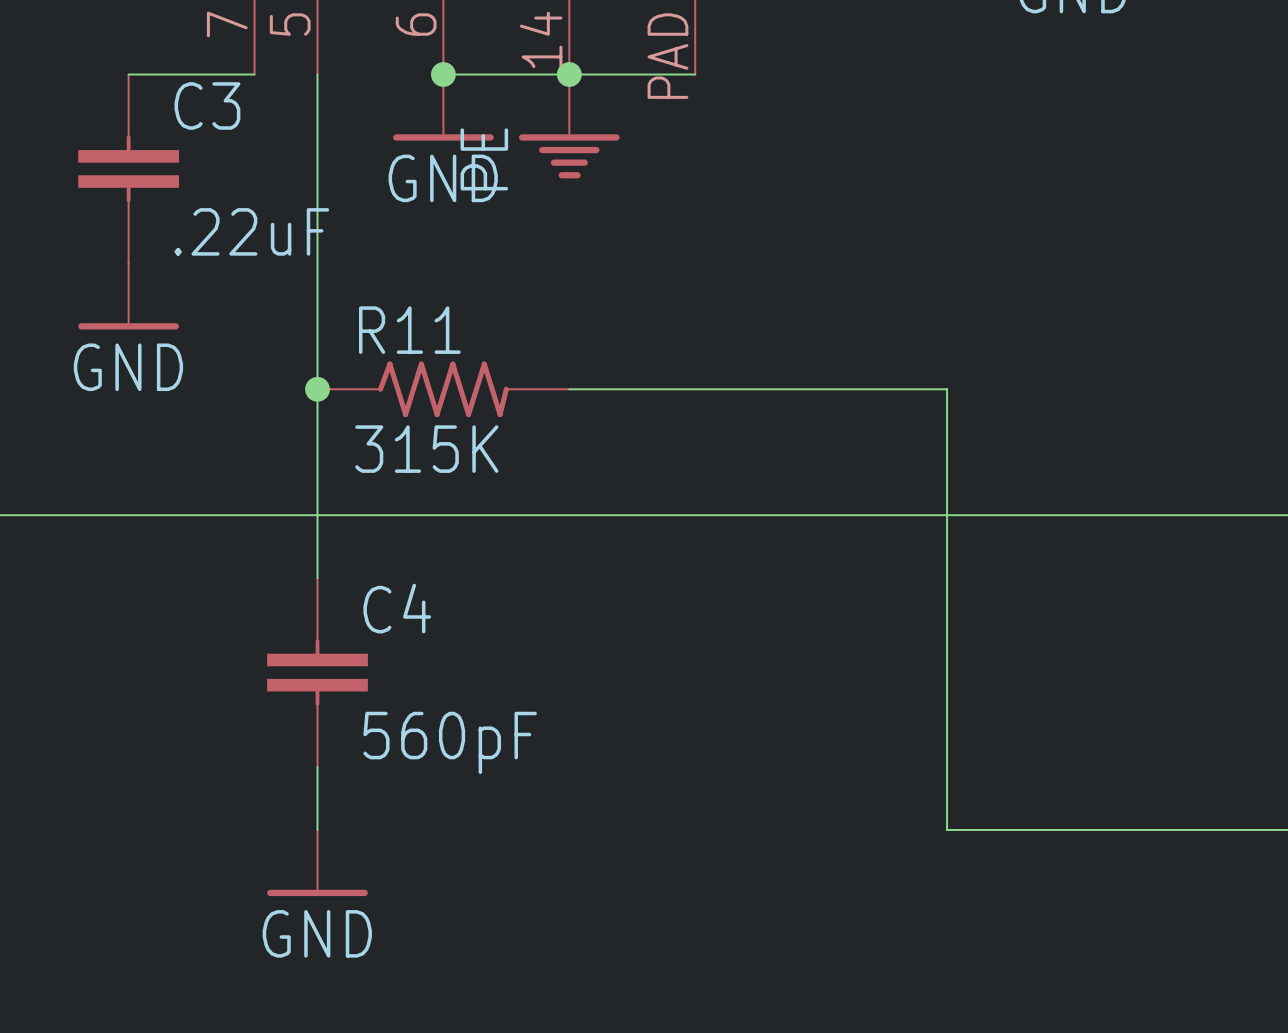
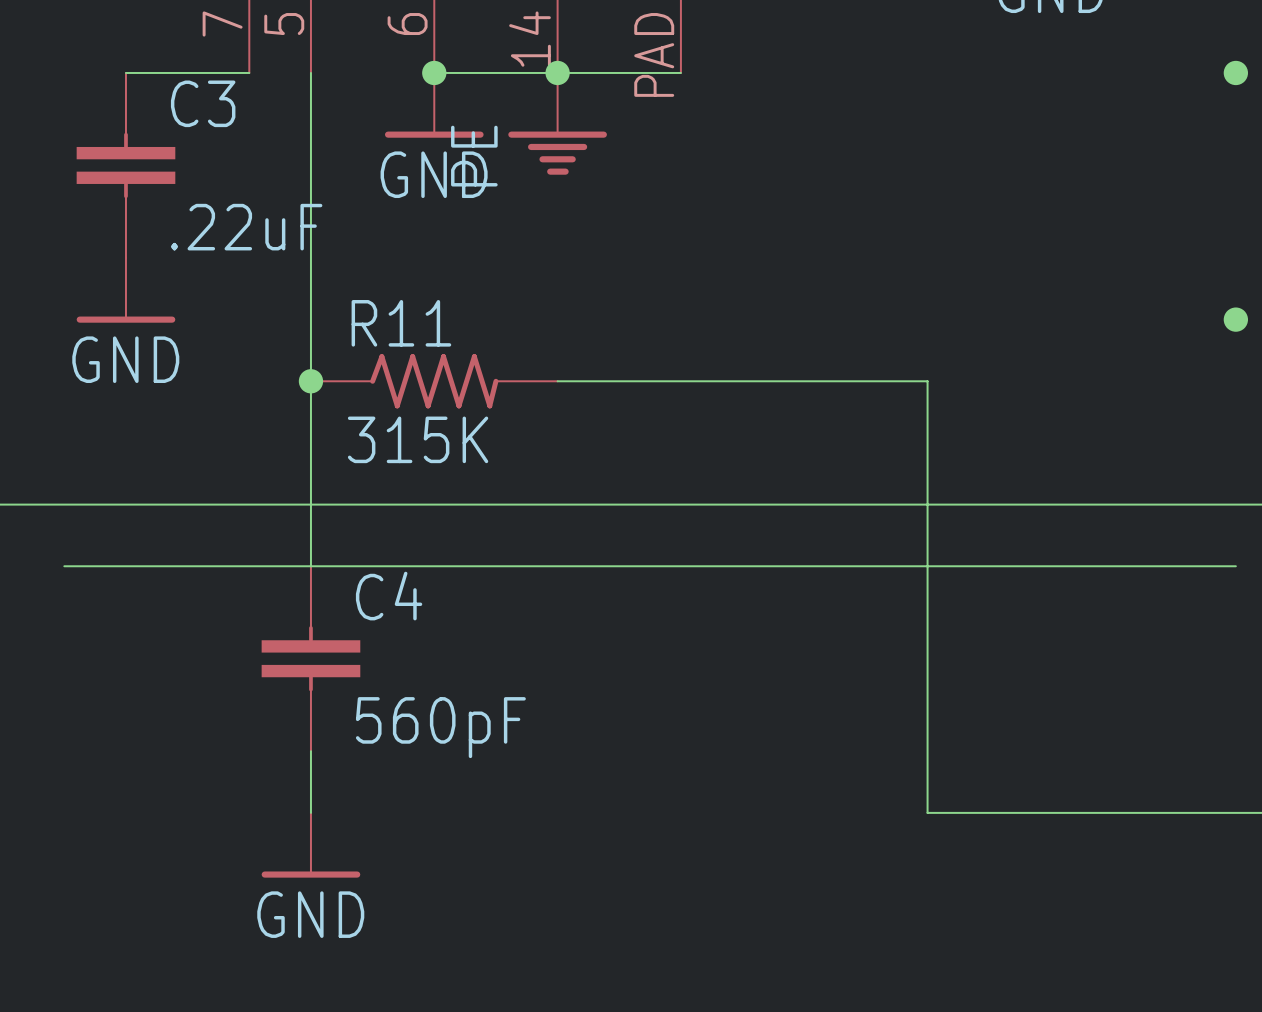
junction: none -> (1235, 72)
junction: none -> (1235, 319)
wire: none -> (64, 566) (1235, 566)

